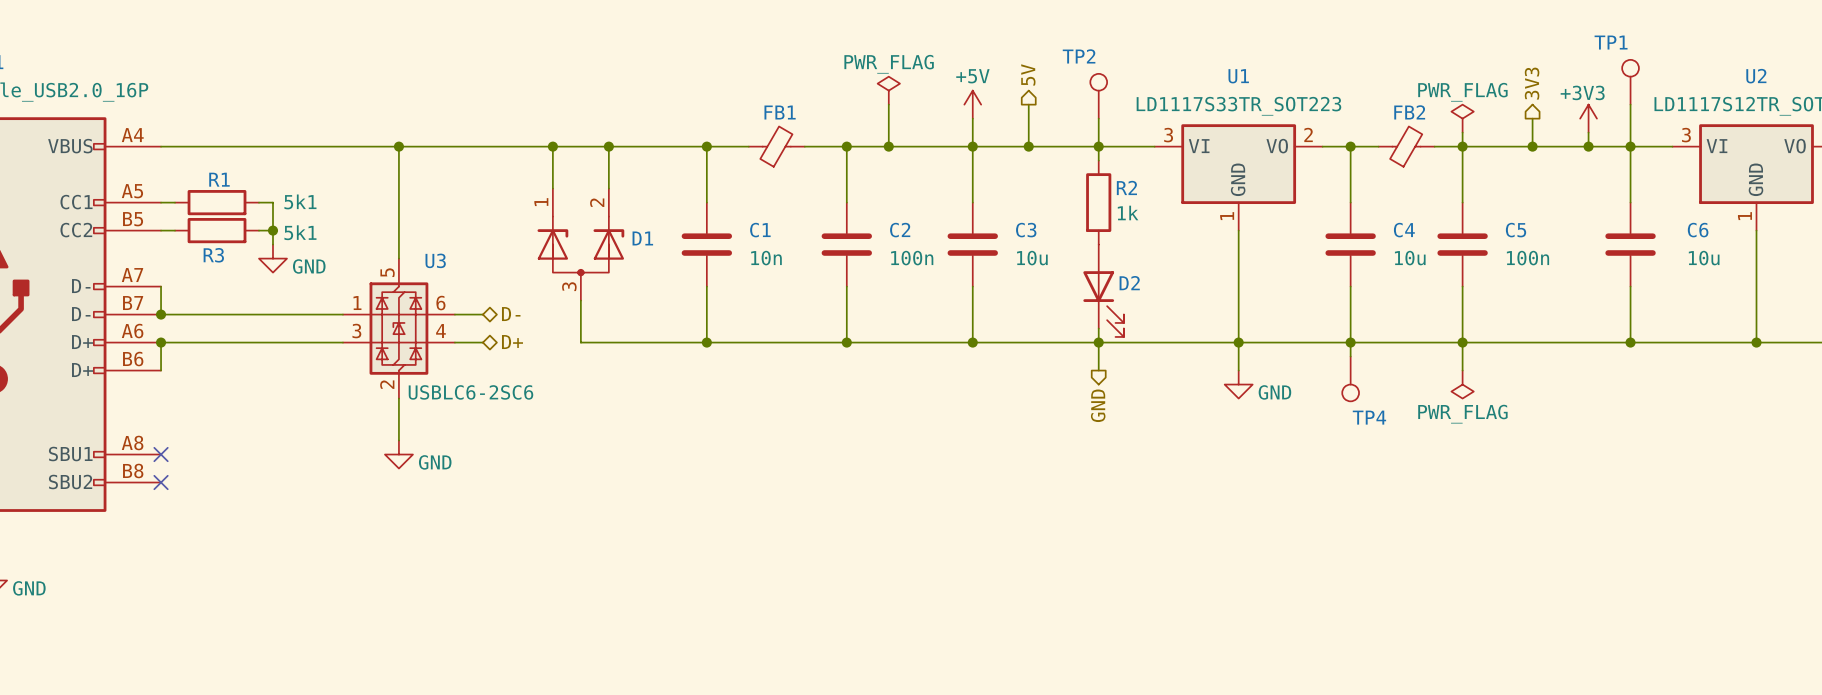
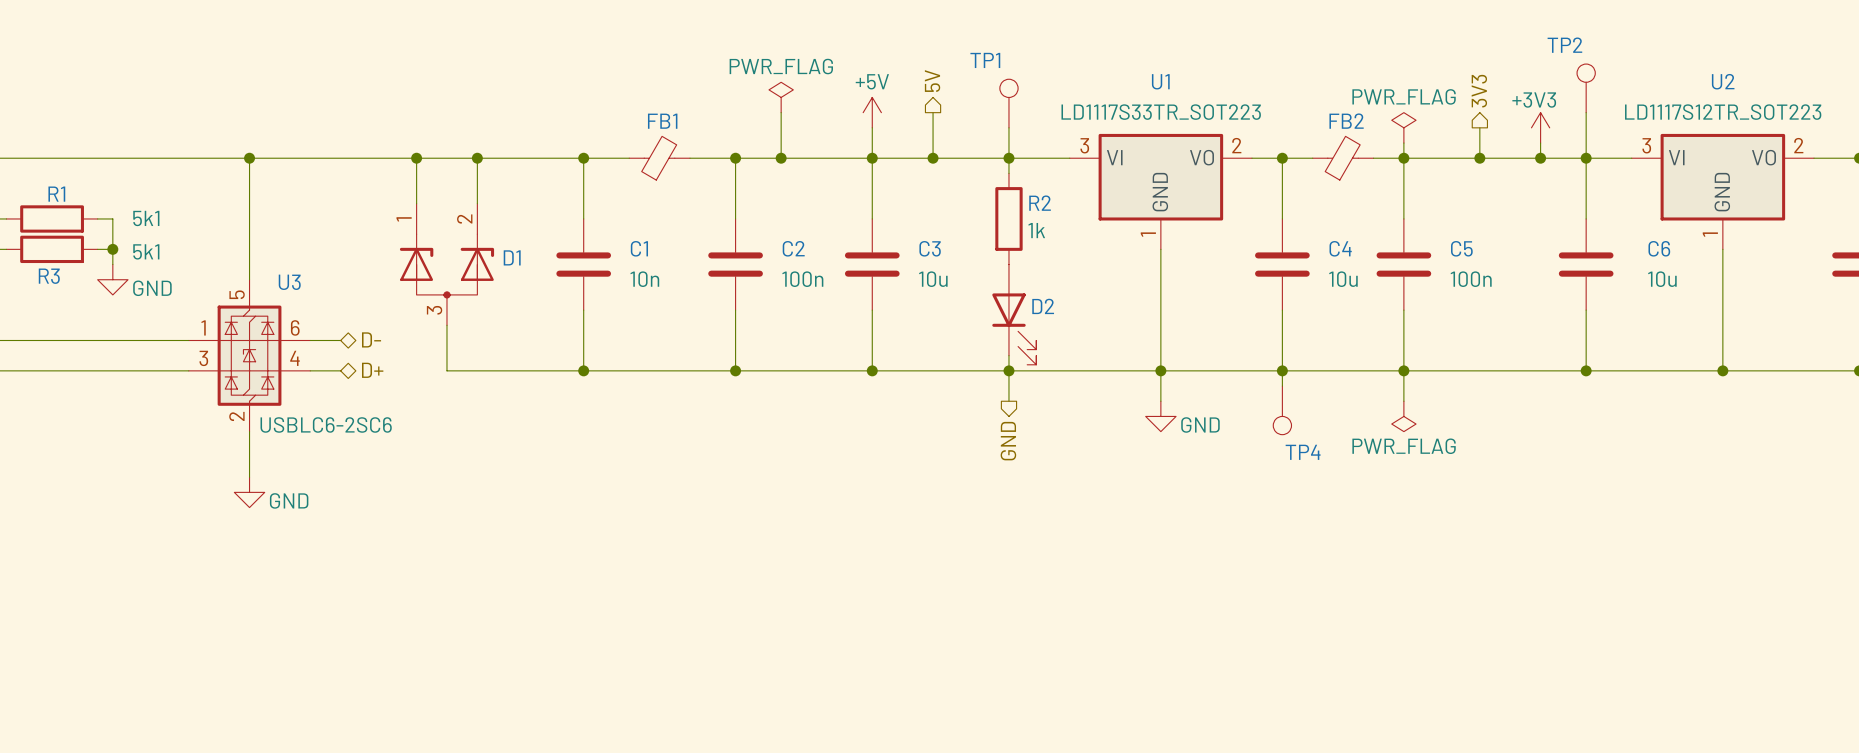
TP1 name: TP1 (1611, 42) -> TP2 (1564, 45)
TP2 name: TP2 (1079, 56) -> TP1 (985, 60)

